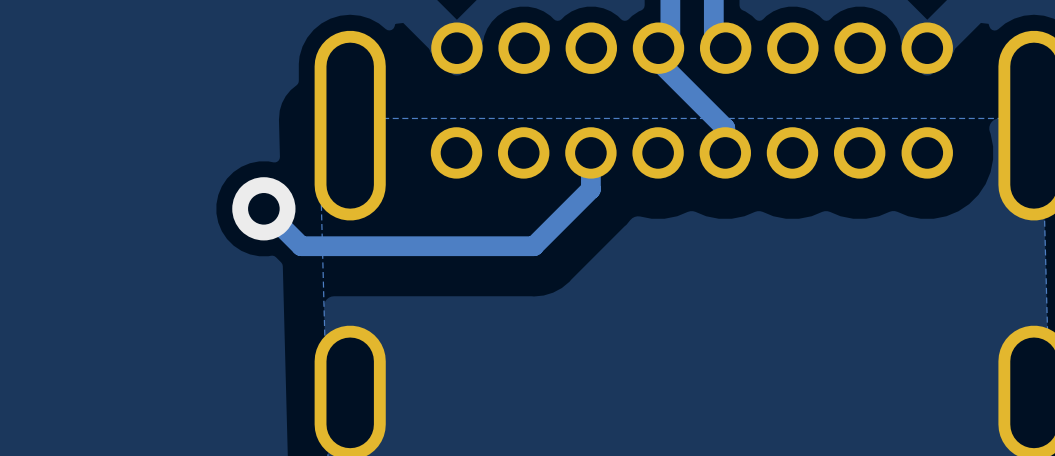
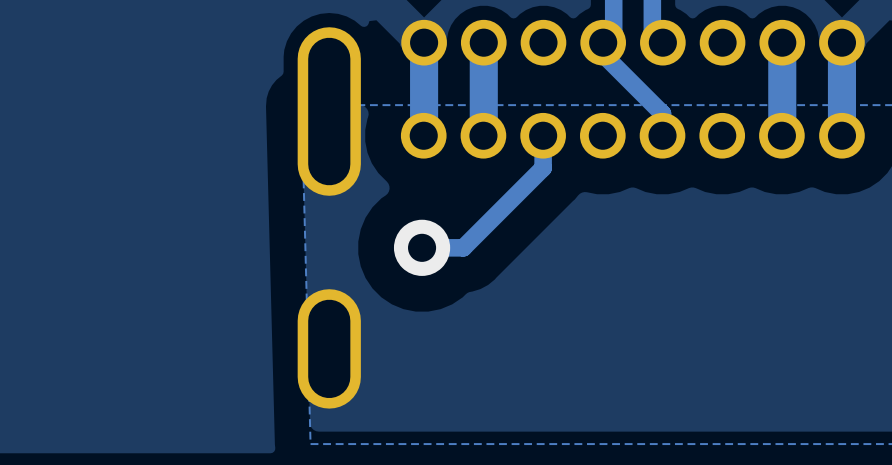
track: none -> (424, 42) (424, 135)
track: none -> (483, 42) (483, 135)
track: none -> (782, 42) (782, 135)
track: none -> (841, 42) (841, 135)
track: (263, 208) (301, 246) (533, 246) -> (422, 247) (463, 247) (492, 218)
via position: (263, 208) -> (422, 247)

